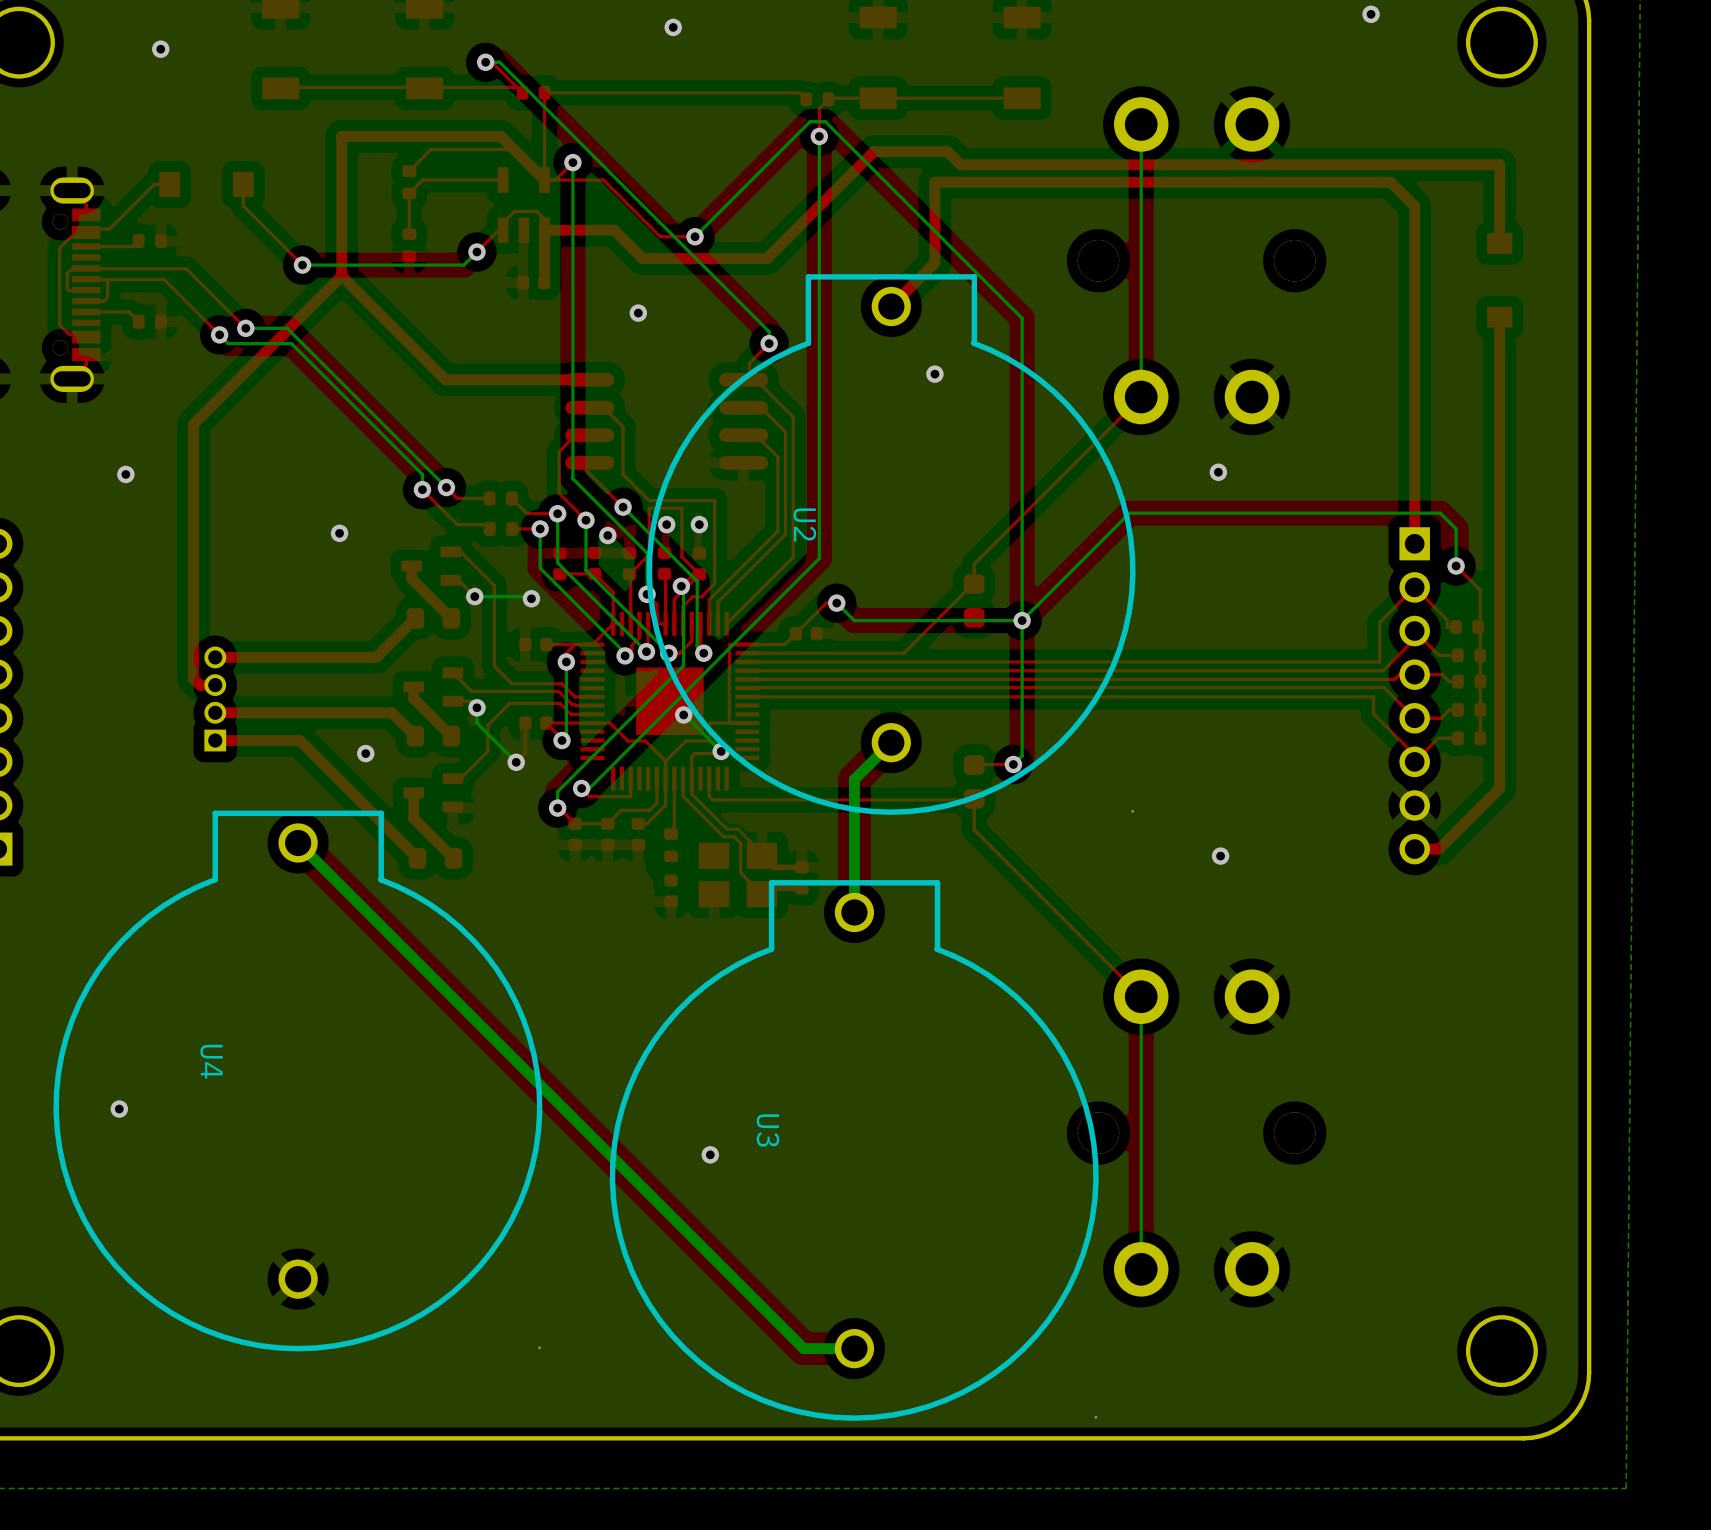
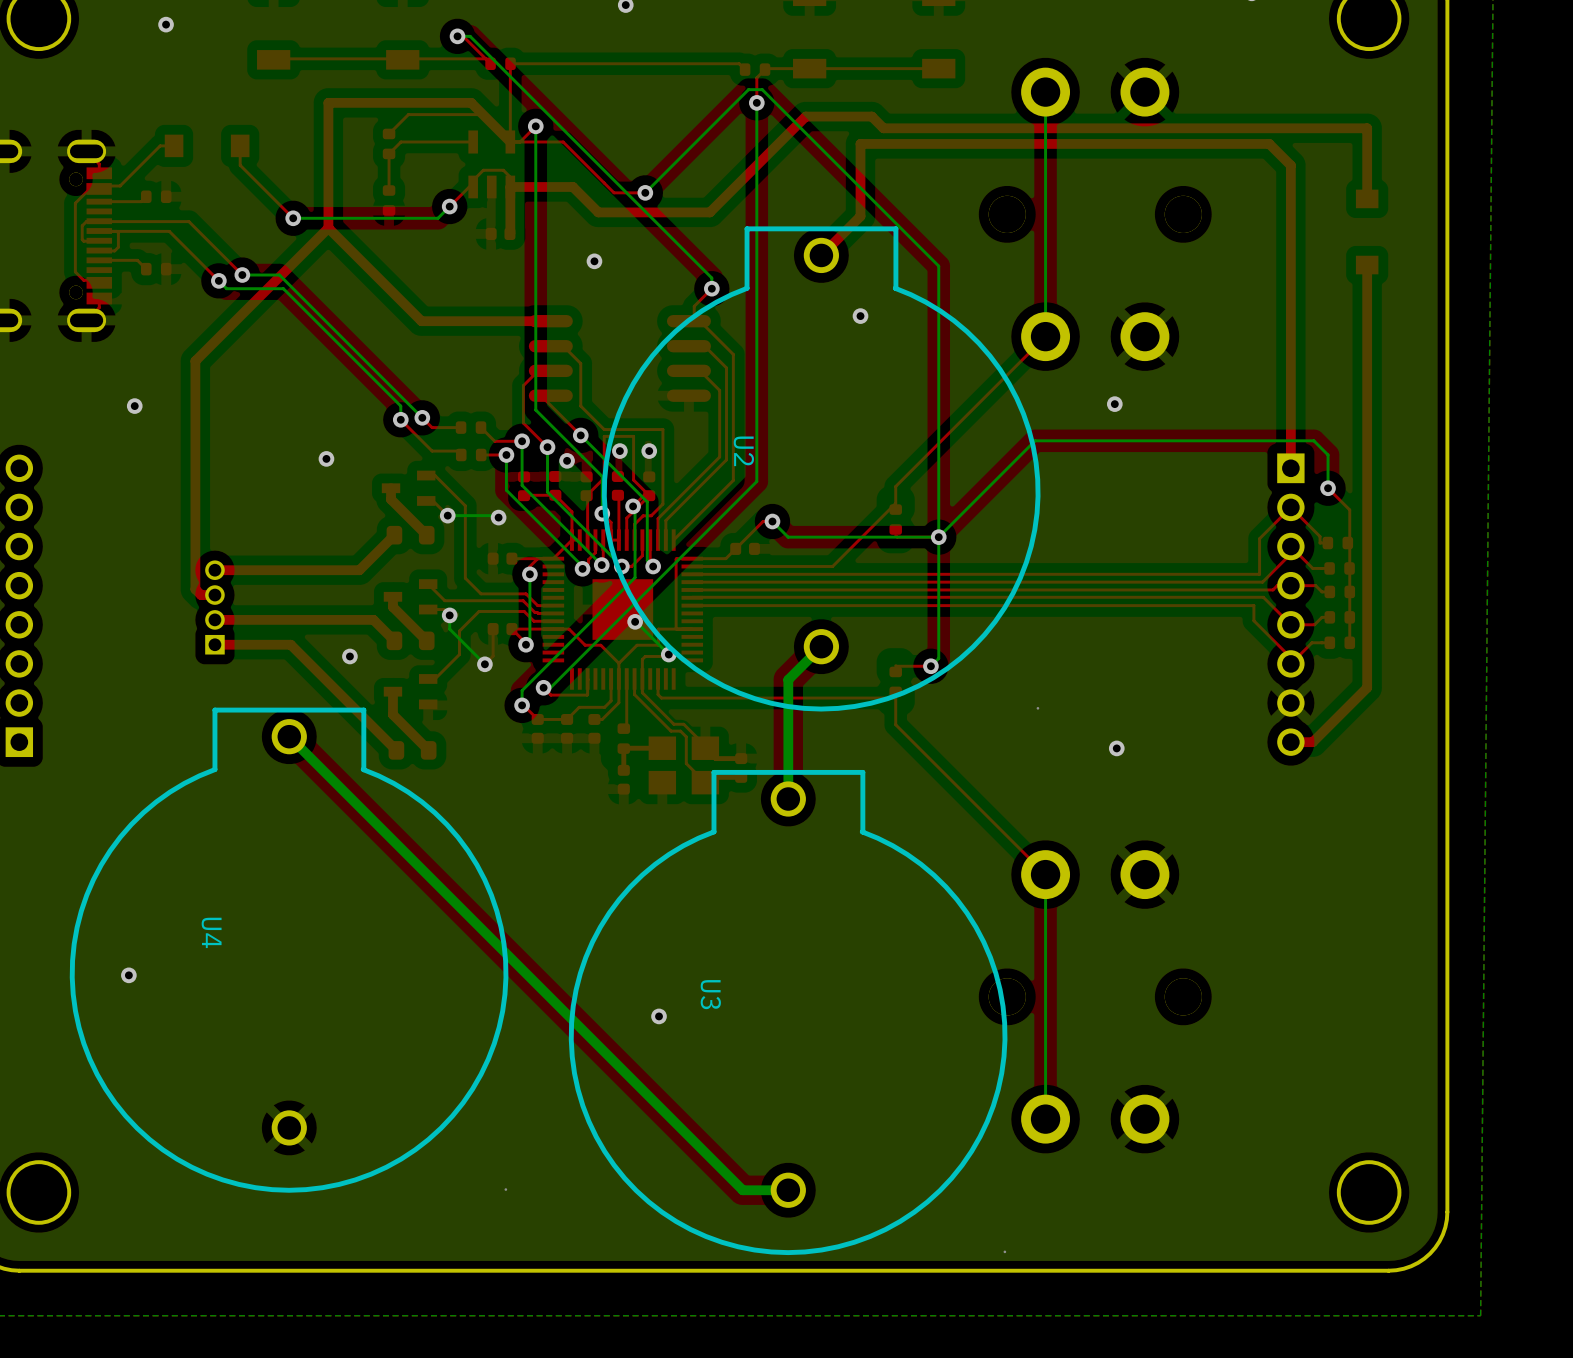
part footprint: [963, 574, 985, 628] -> [889, 504, 902, 535]
part footprint: [963, 755, 985, 809] -> [889, 666, 902, 698]
top track: none -> (662, 748) (624, 748) (623, 770)

